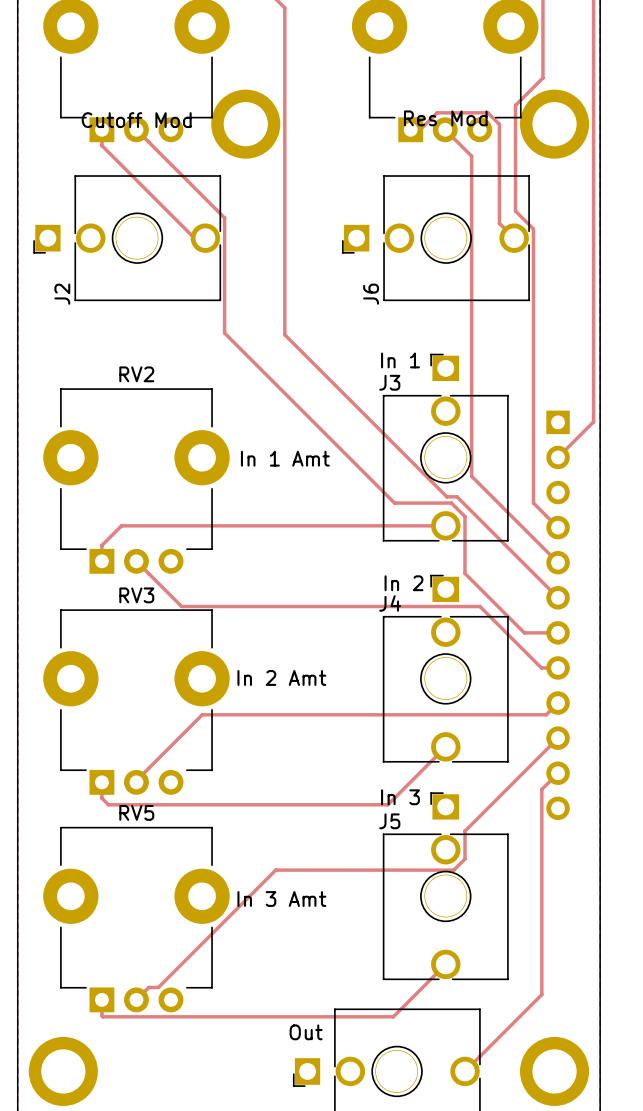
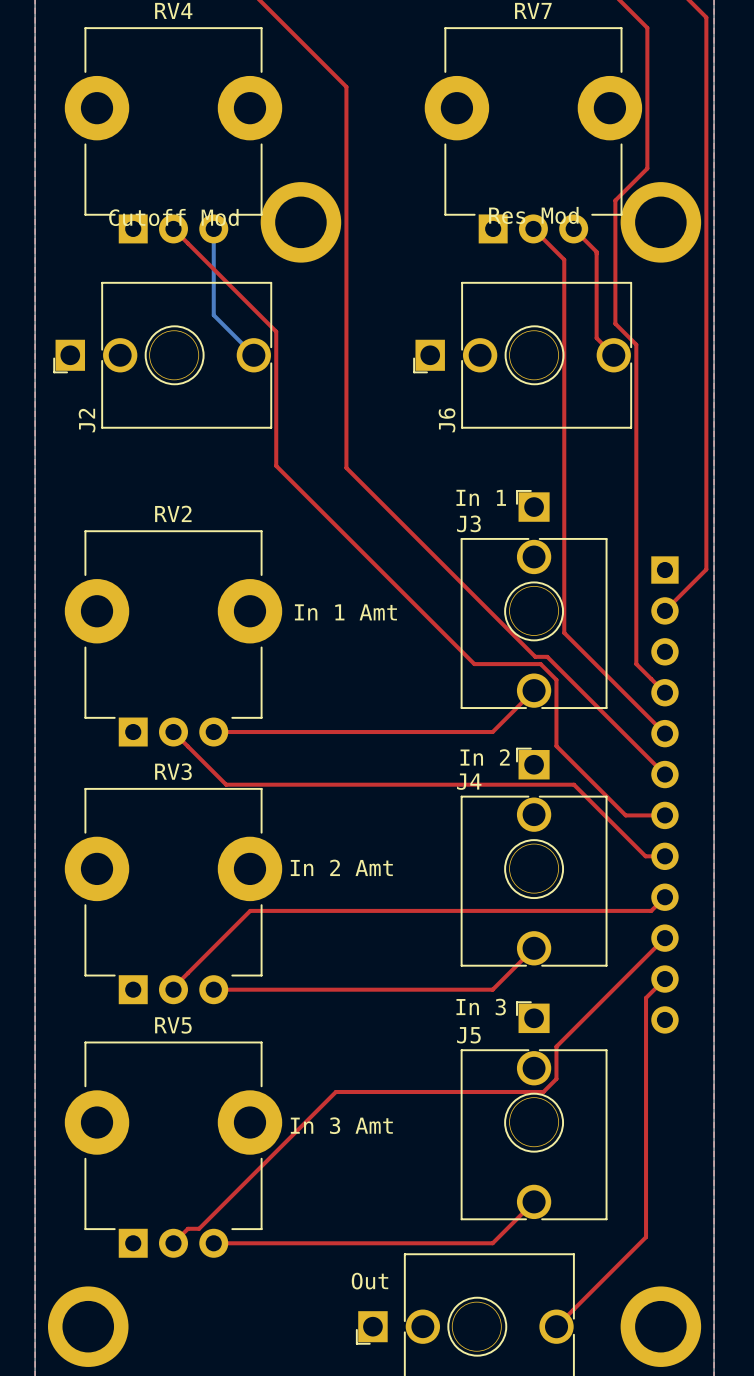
top track: (101, 129) (101, 145) (194, 238) -> none
bottom track: none -> (213, 228) (213, 315) (253, 355)
top track: (410, 129) (420, 129) (437, 112) (487, 112) (499, 124) (499, 149) -> (573, 228) (596, 251)
top track: (445, 525) (121, 525) (101, 545) (101, 561) -> (534, 690) (492, 732) (213, 732)
top track: (101, 782) (101, 798) (108, 804) (387, 804) (410, 782) -> (213, 989) (492, 989)
top track: (101, 999) (102, 1016) (393, 1016) (410, 999) -> (213, 1243) (492, 1243)

